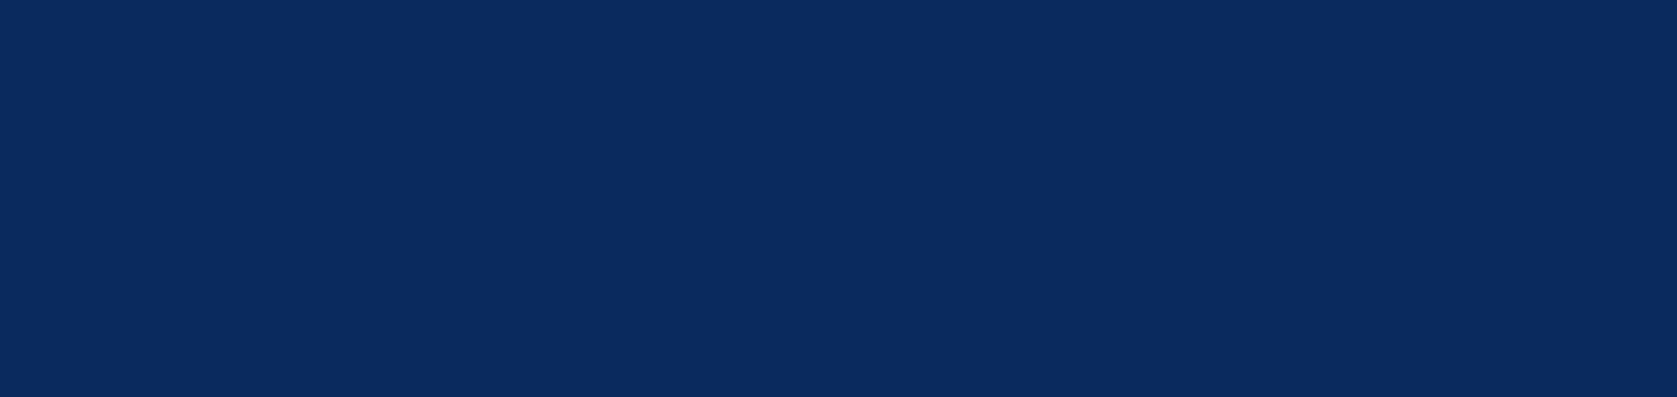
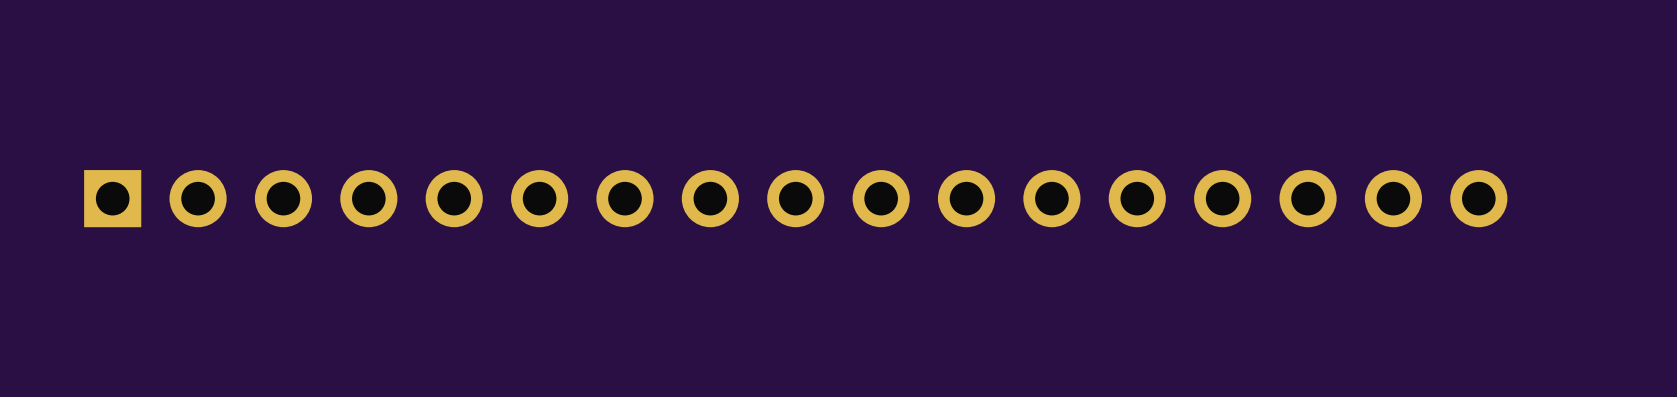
part: none -> (795, 198)

